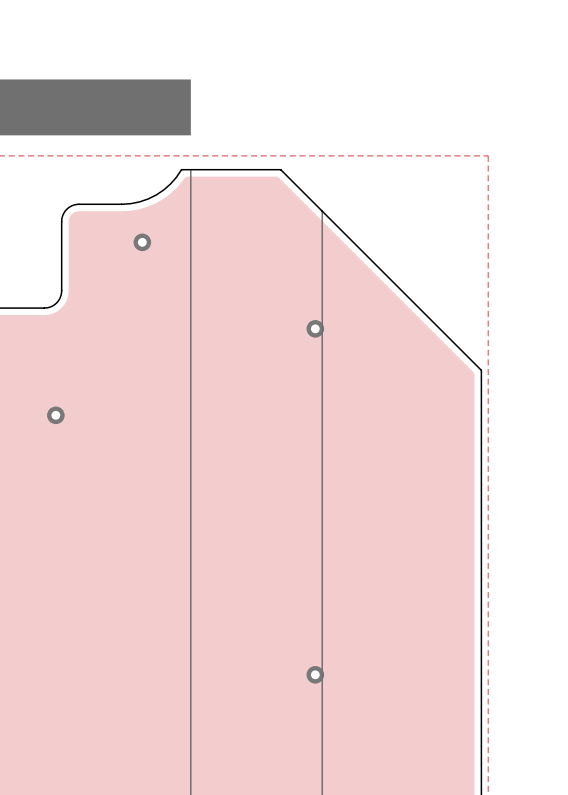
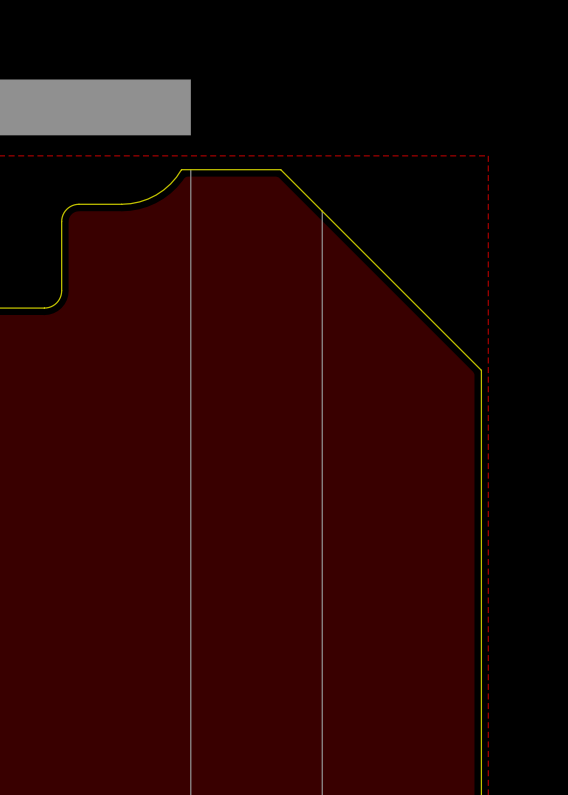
via: (142, 242) -> none
via: (315, 328) -> none
via: (55, 415) -> none
via: (315, 674) -> none

